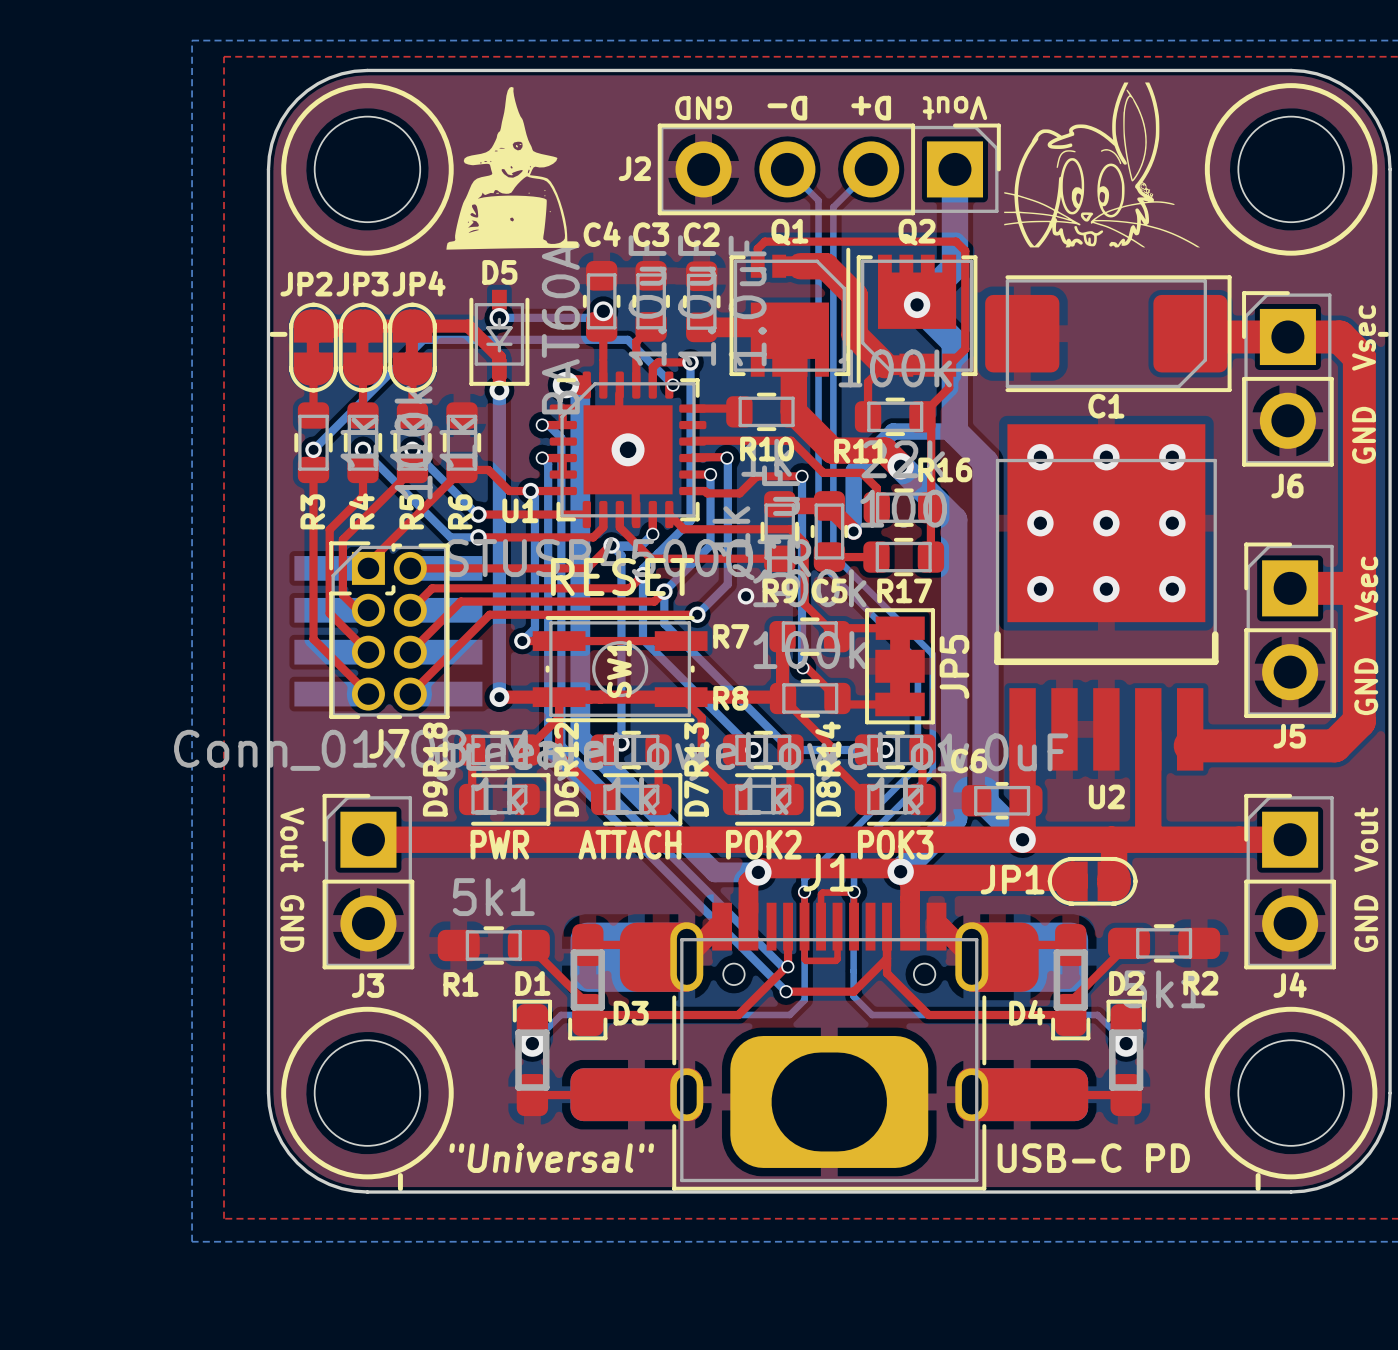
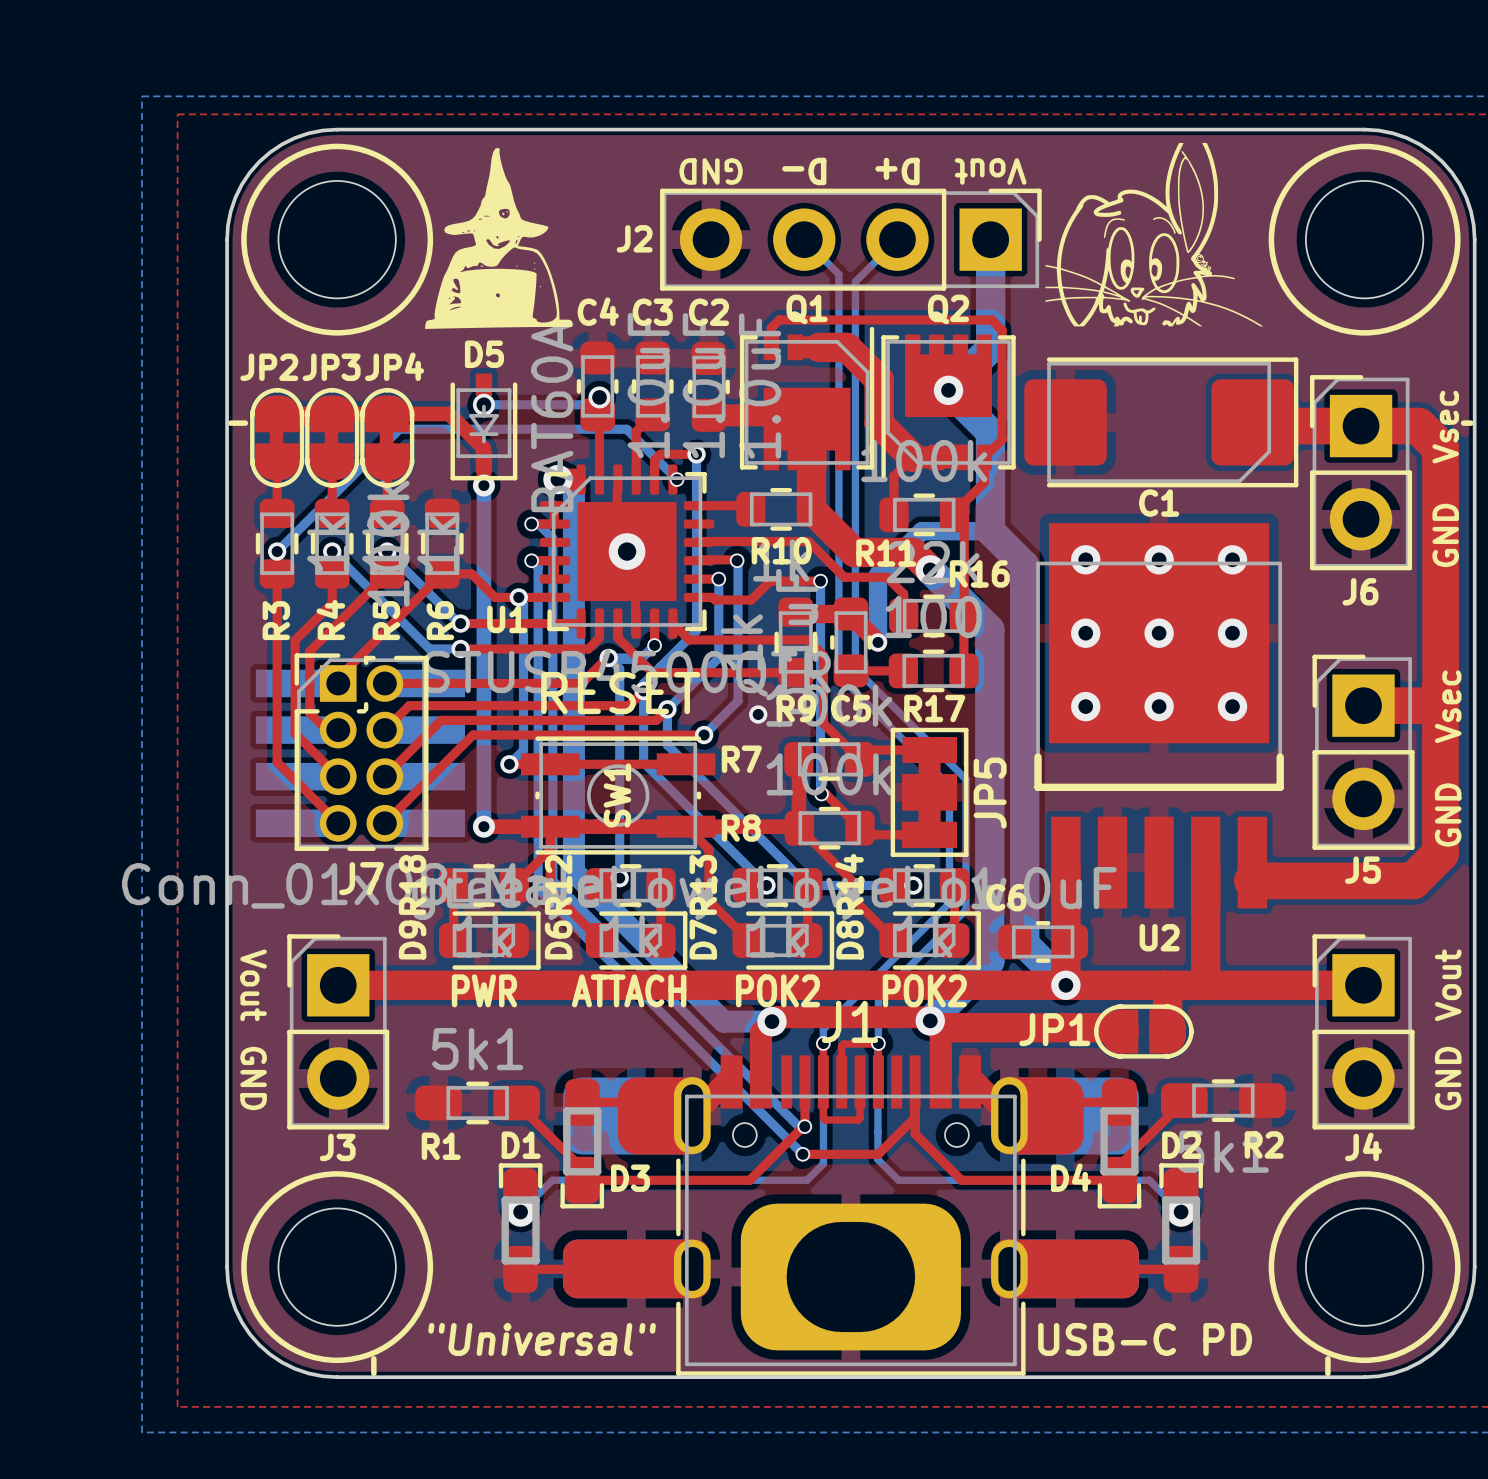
text: POK3 (895, 844) -> POK2 (924, 990)

